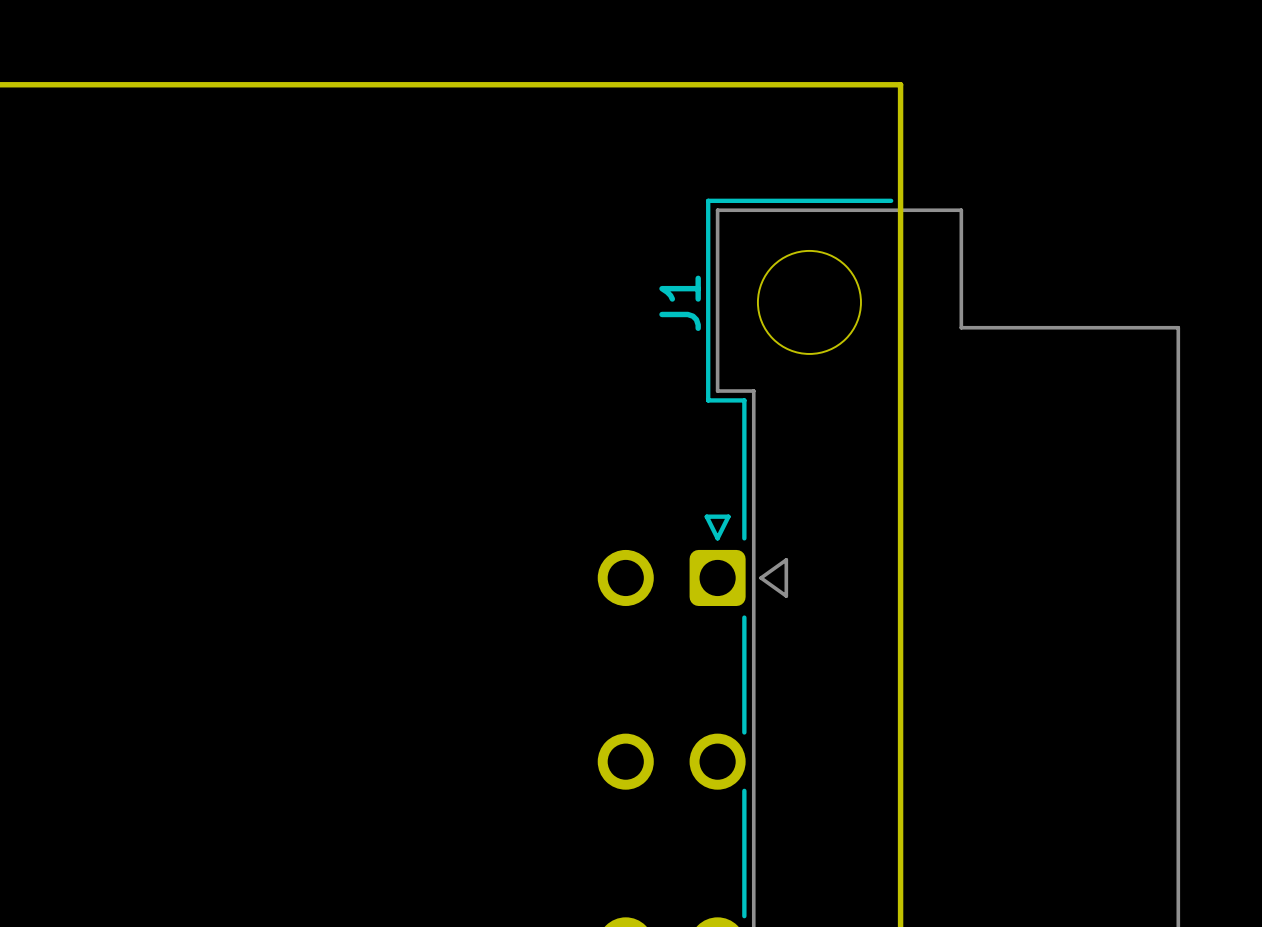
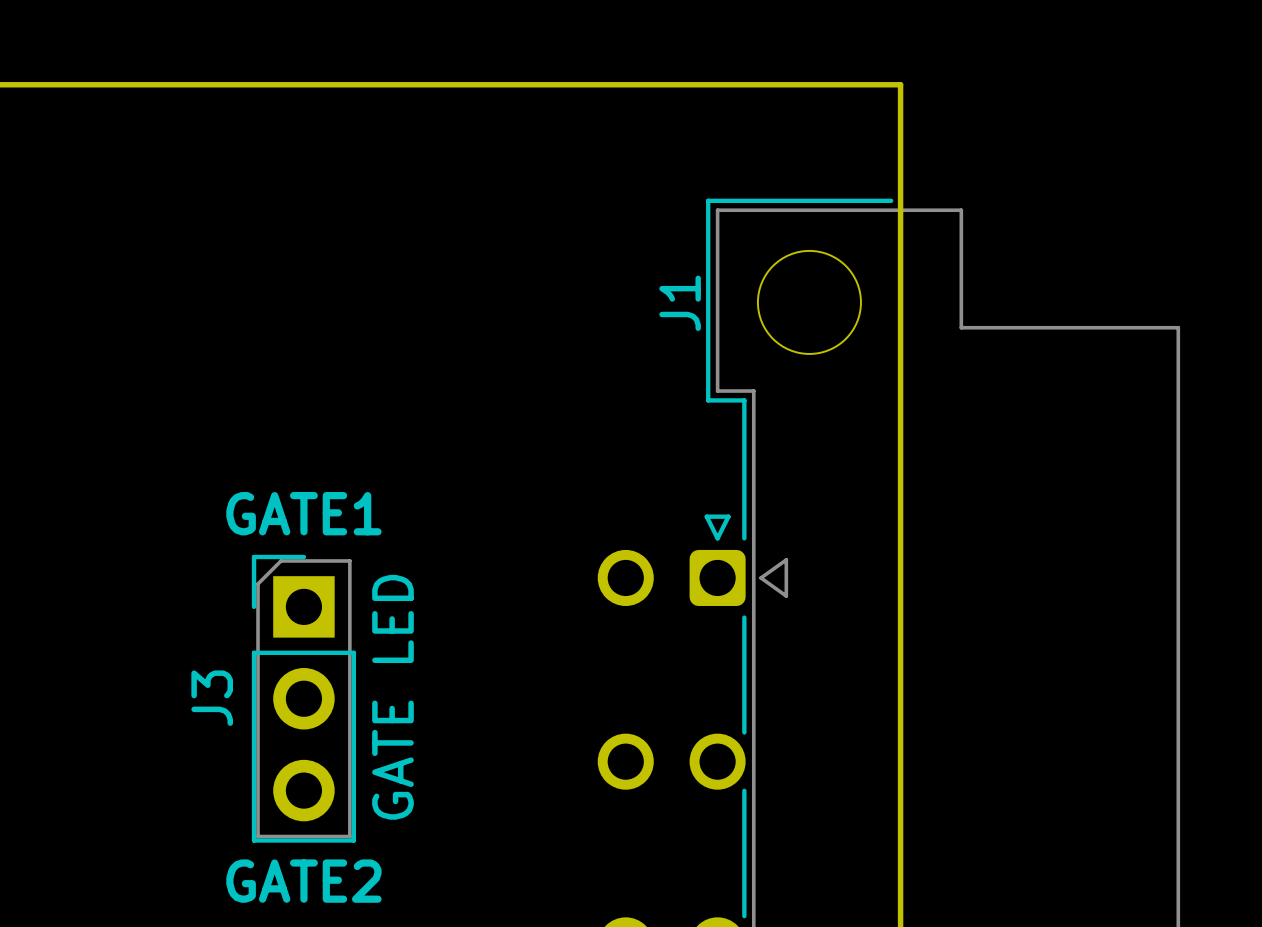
text: none -> GATE1 (303, 513)
J3: none -> GATE LED (303, 698)
text: none -> GATE2 (303, 881)

